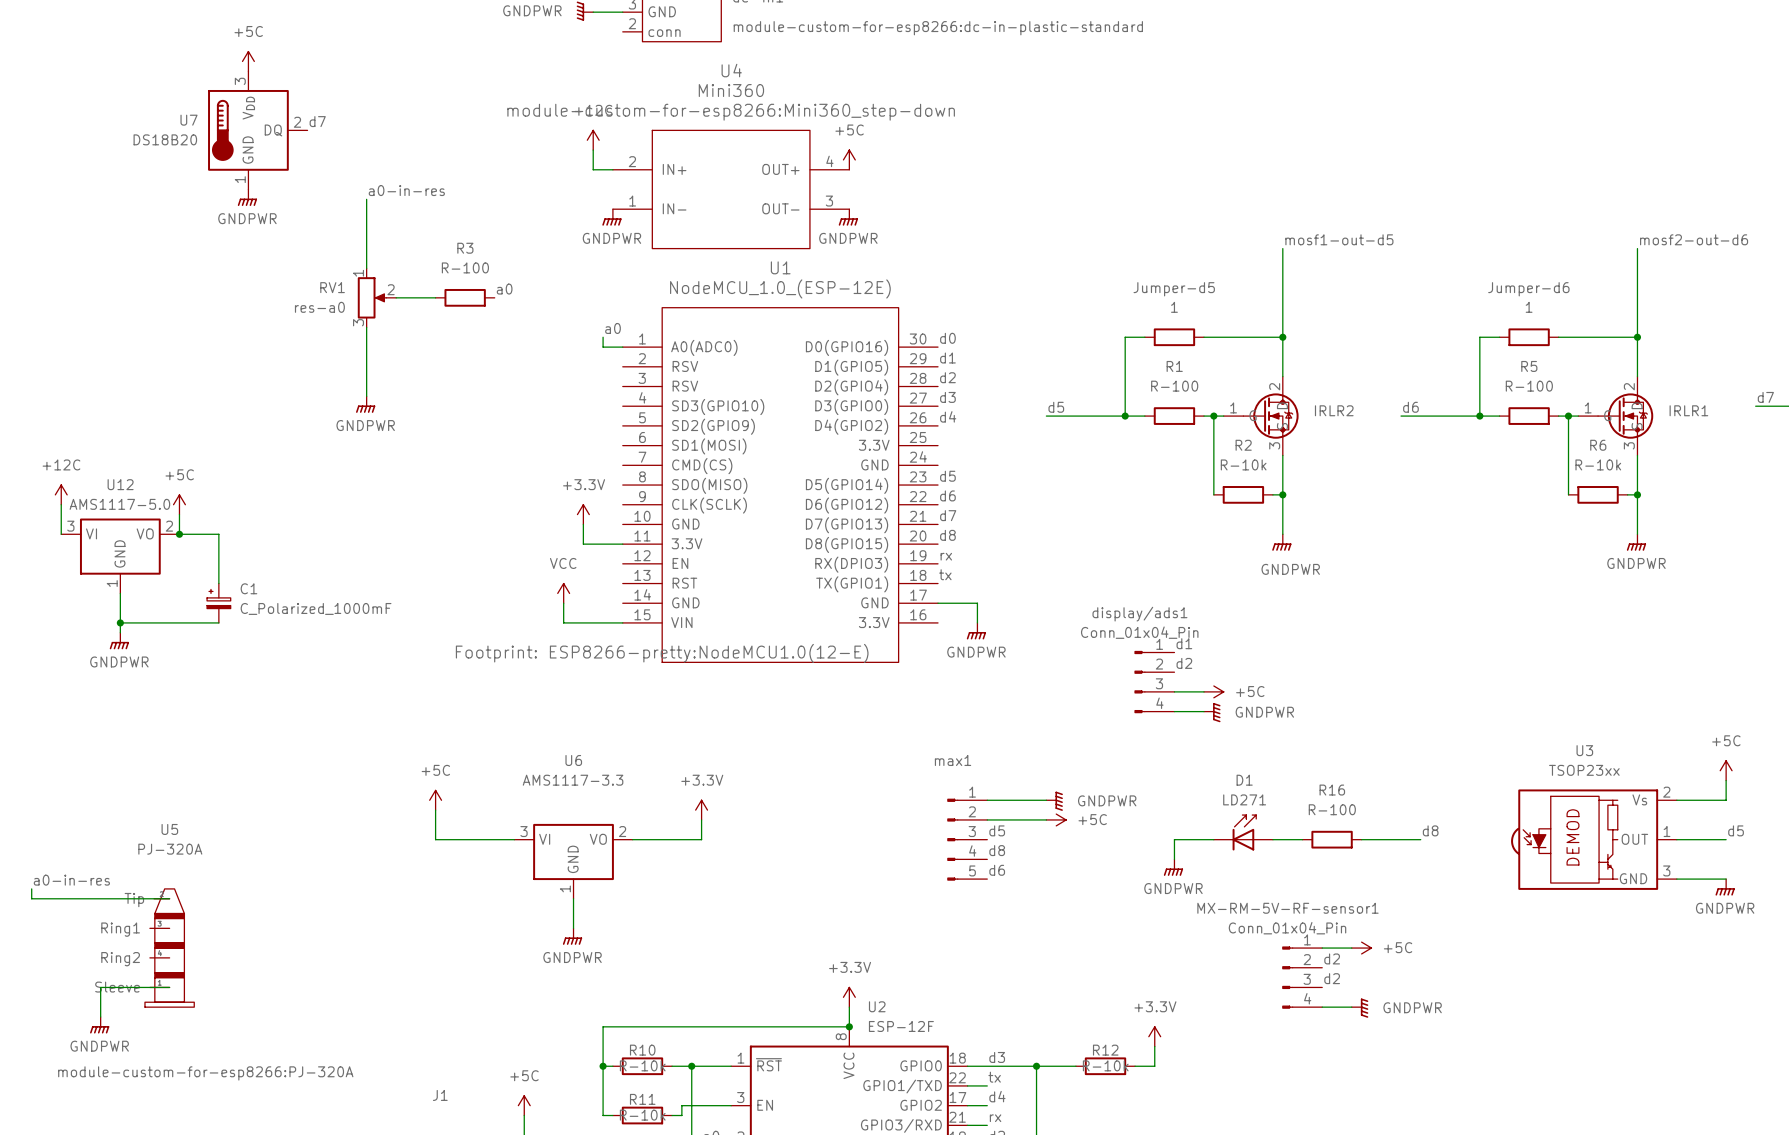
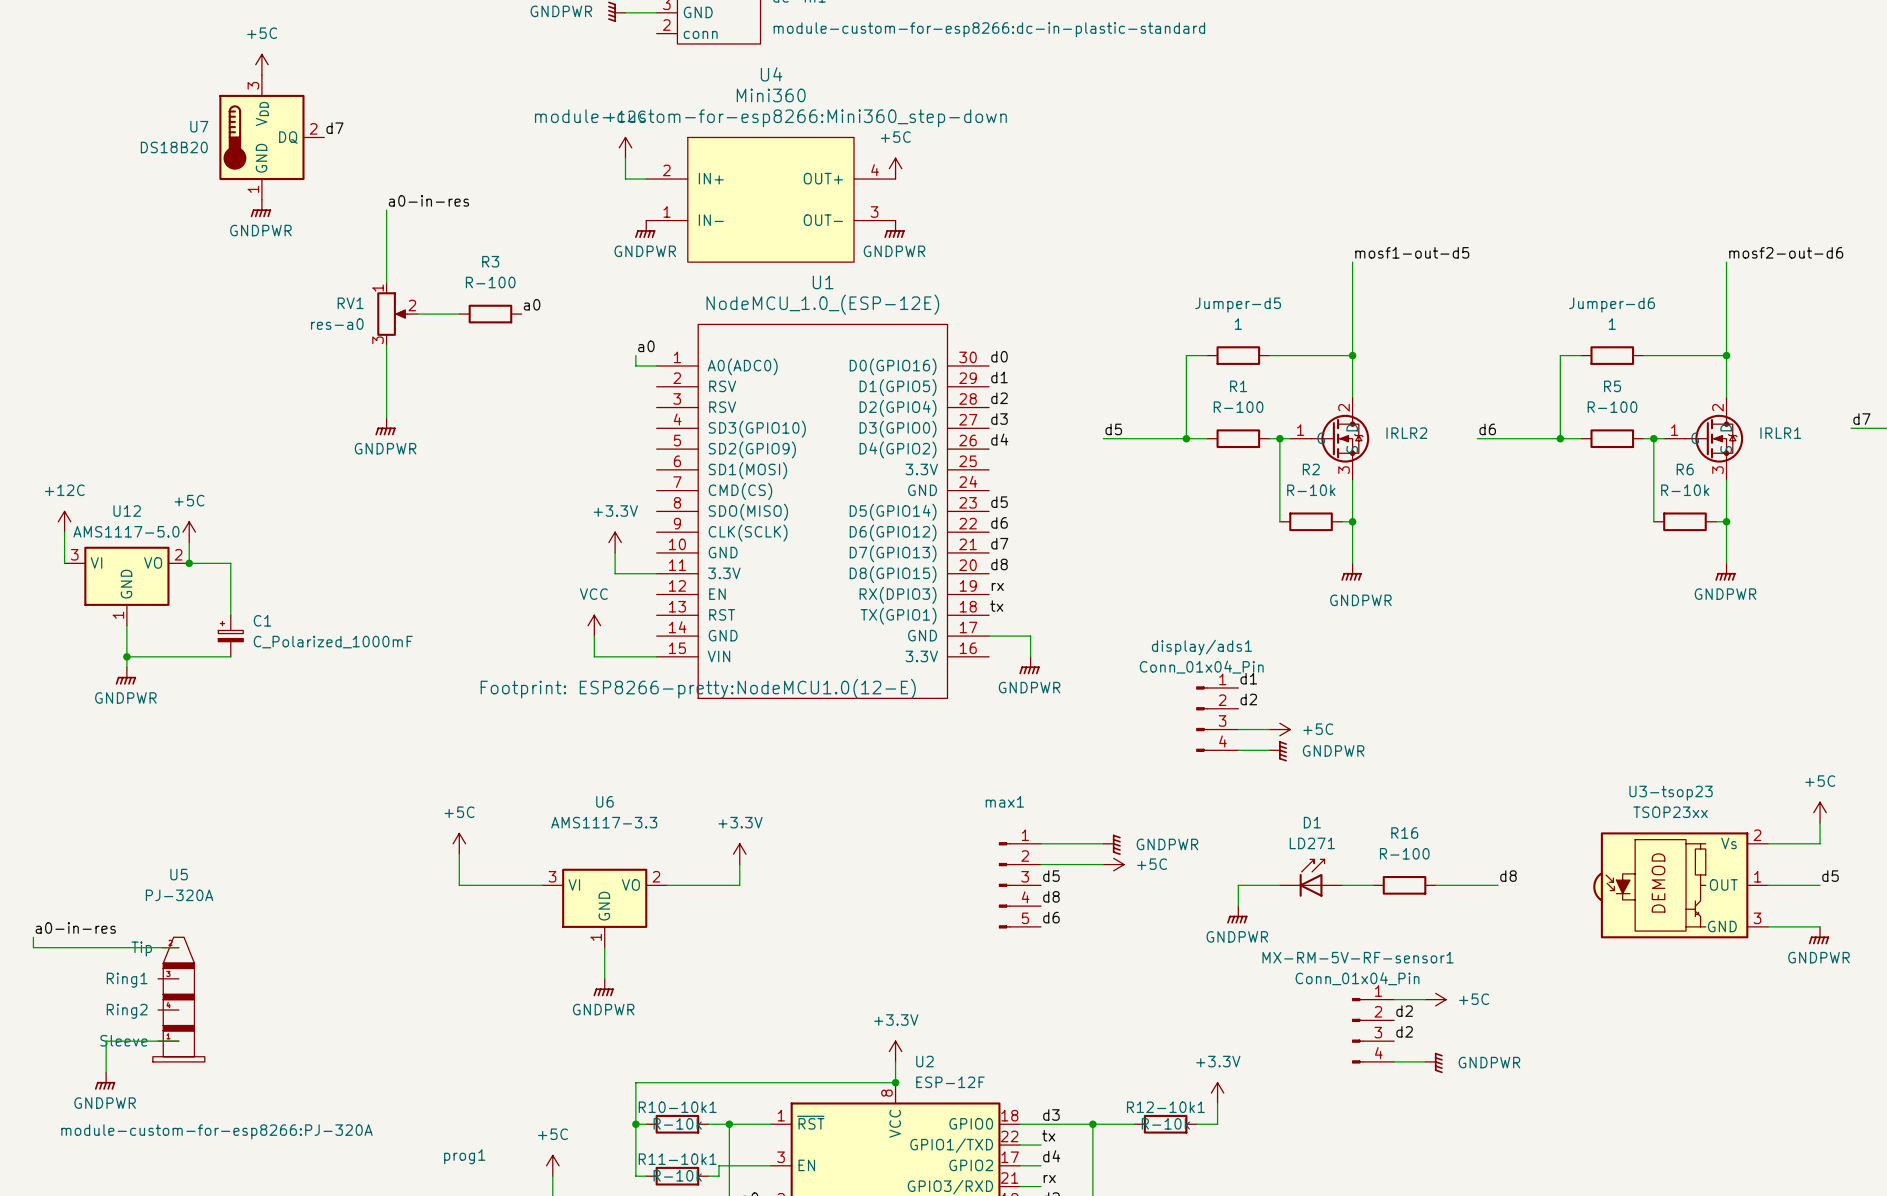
U3 name: U3 (1584, 750) -> U3-tsop23 (1671, 793)
R10 name: R10 (642, 1050) -> R10-10k1 (677, 1107)
R12 name: R12 (1105, 1050) -> R12-10k1 (1165, 1107)
J1 name: J1 (440, 1095) -> prog1 (464, 1156)
R11 name: R11 (642, 1099) -> R11-10k1 (677, 1159)

